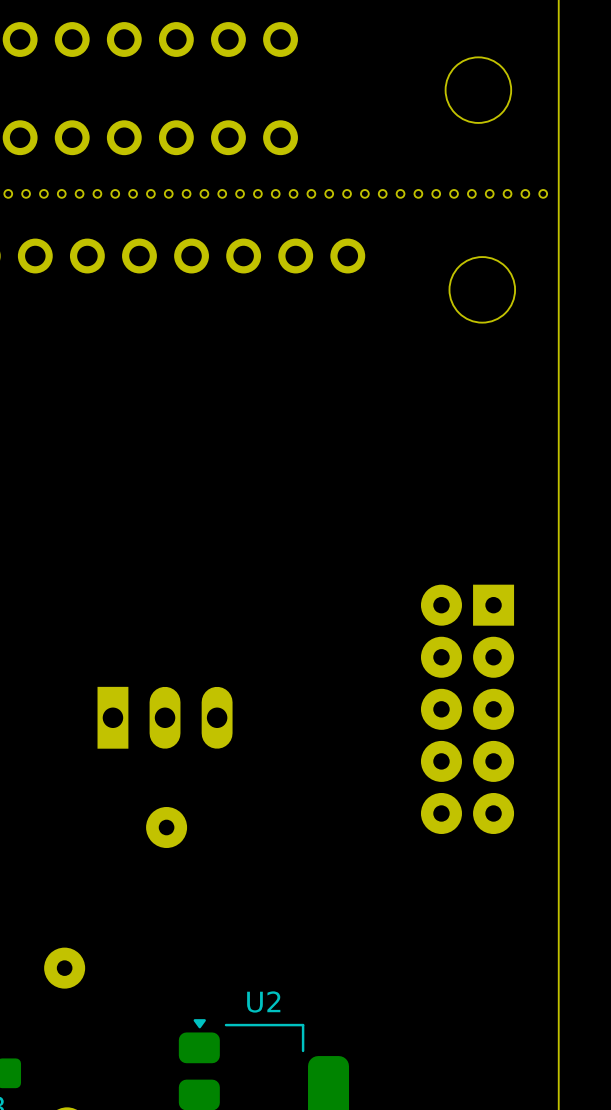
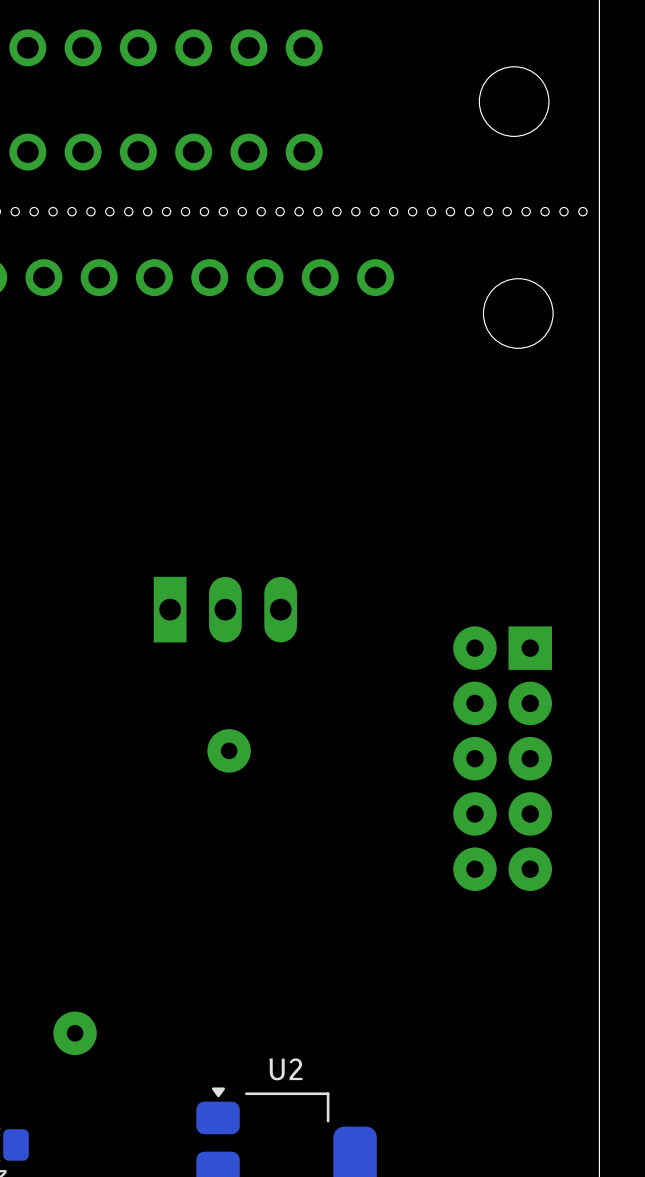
part position: (165, 717) -> (225, 609)
part position: (166, 827) -> (229, 750)

